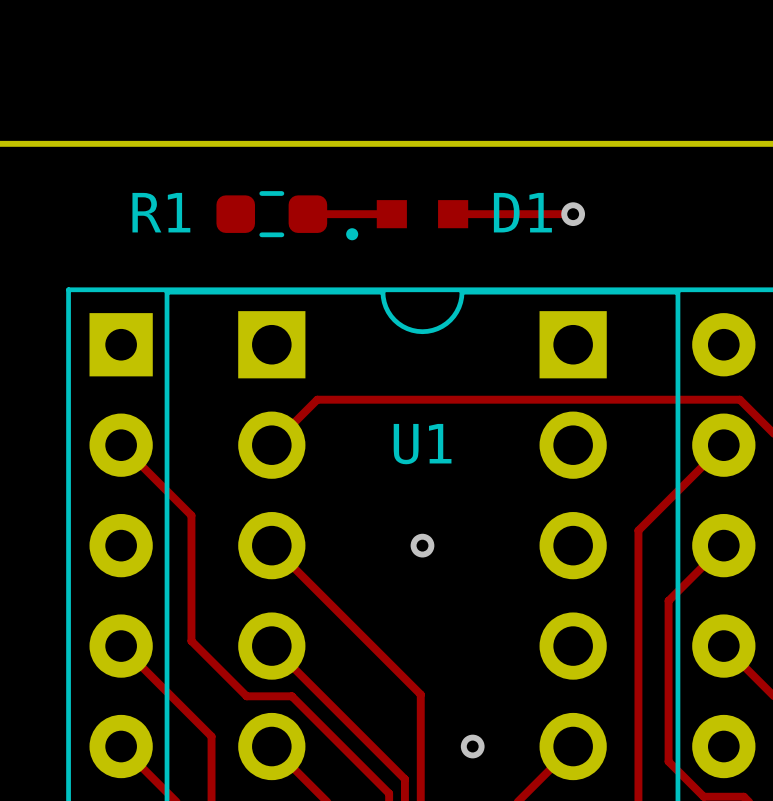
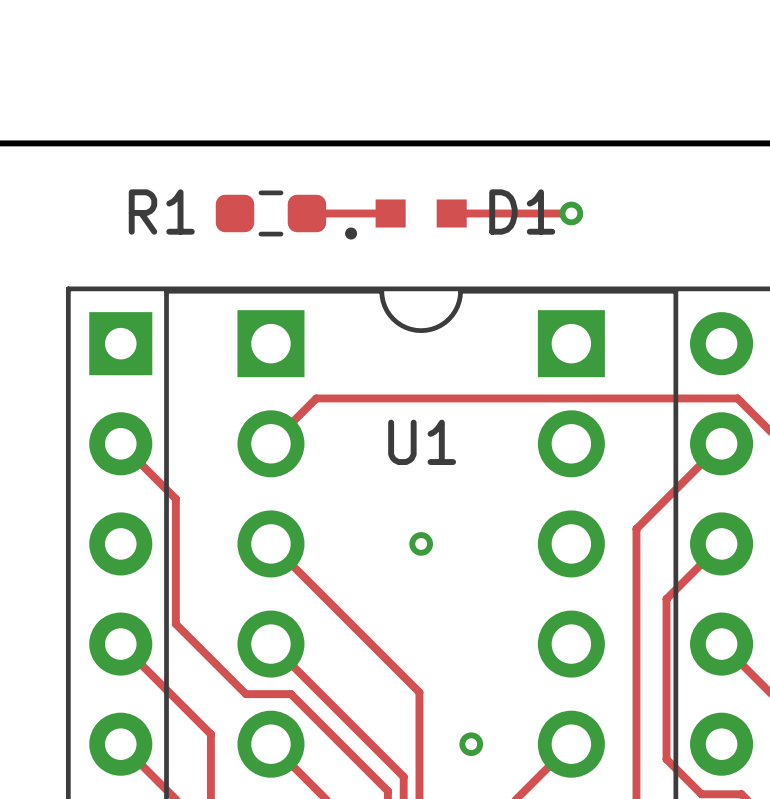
track: (176, 500) (191, 515) (191, 641) -> (175, 498) (175, 624) (190, 639)

